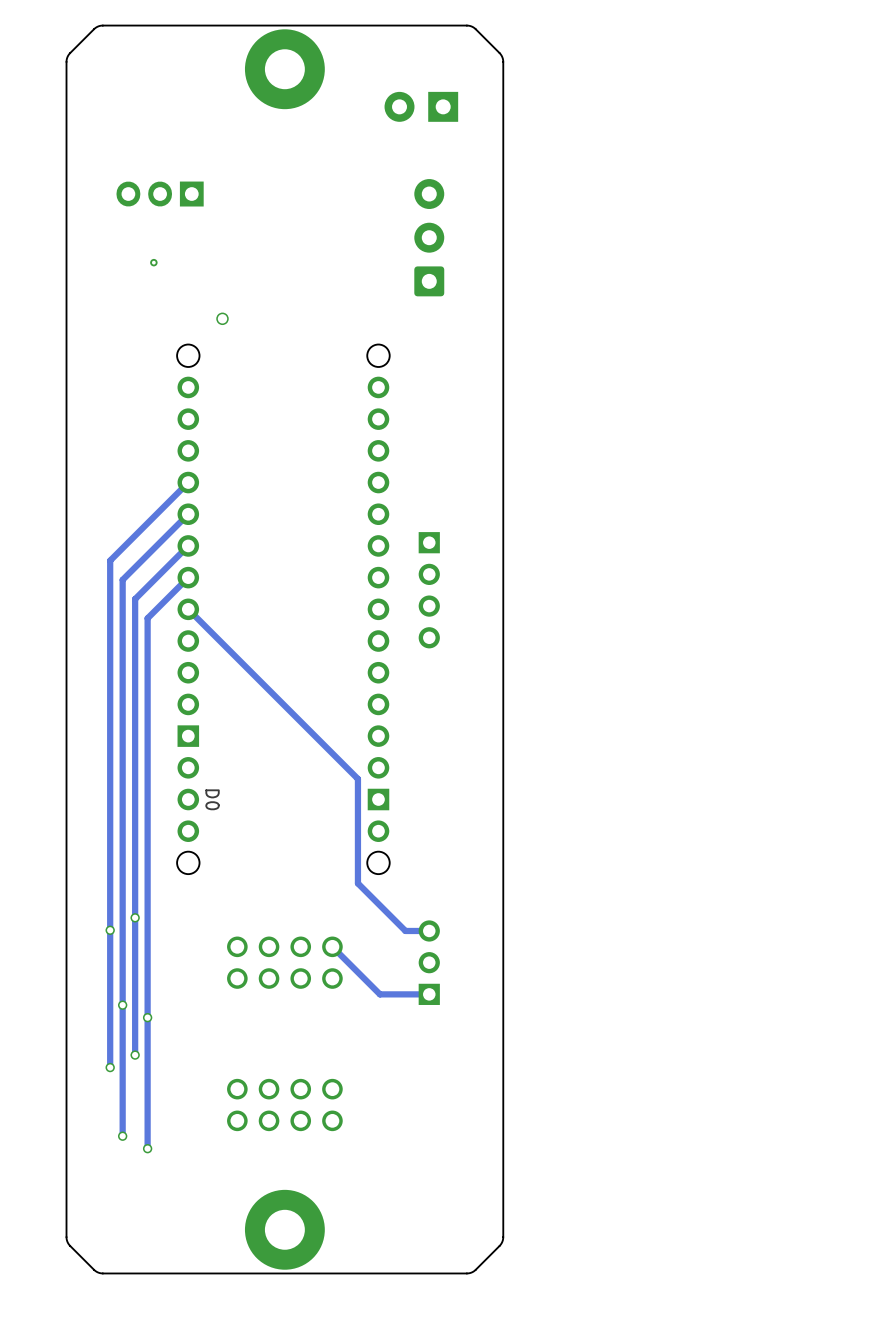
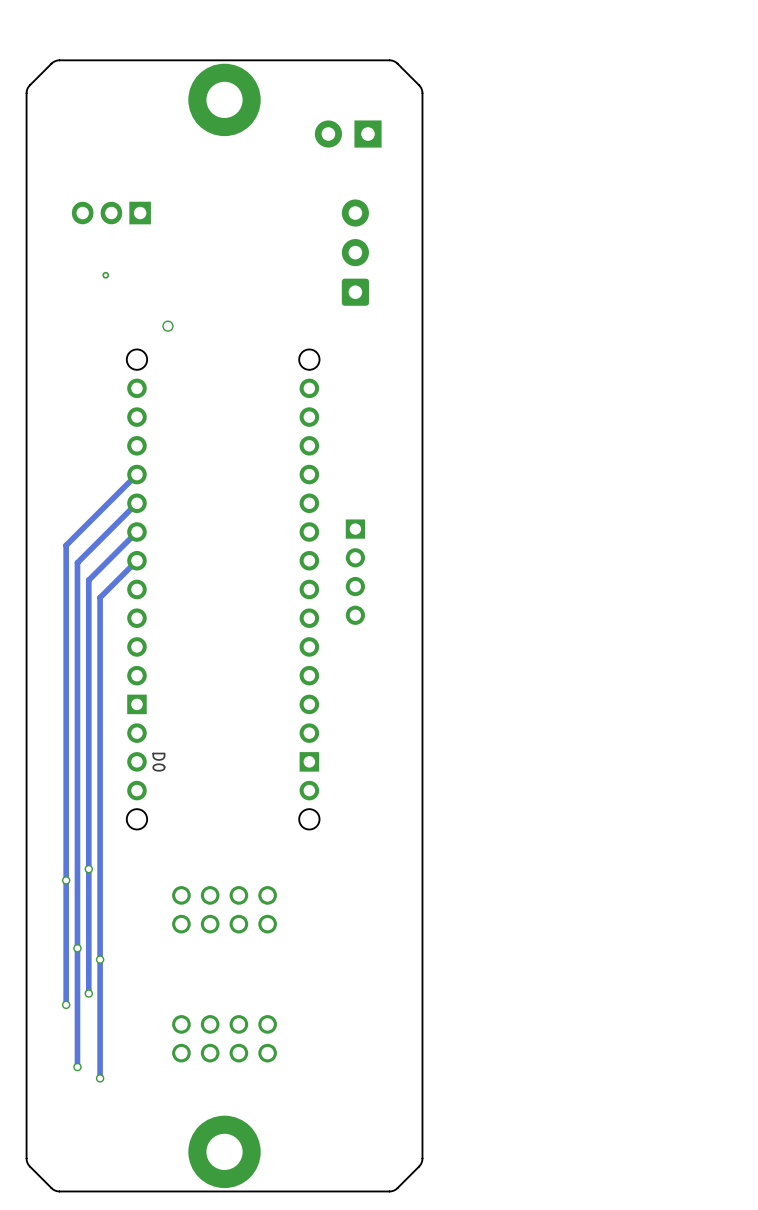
track: (188, 609) (357, 778) (357, 883) (405, 930) (429, 930) -> none
track: (332, 946) (379, 994) (429, 994) -> none
part: (429, 962) -> none

